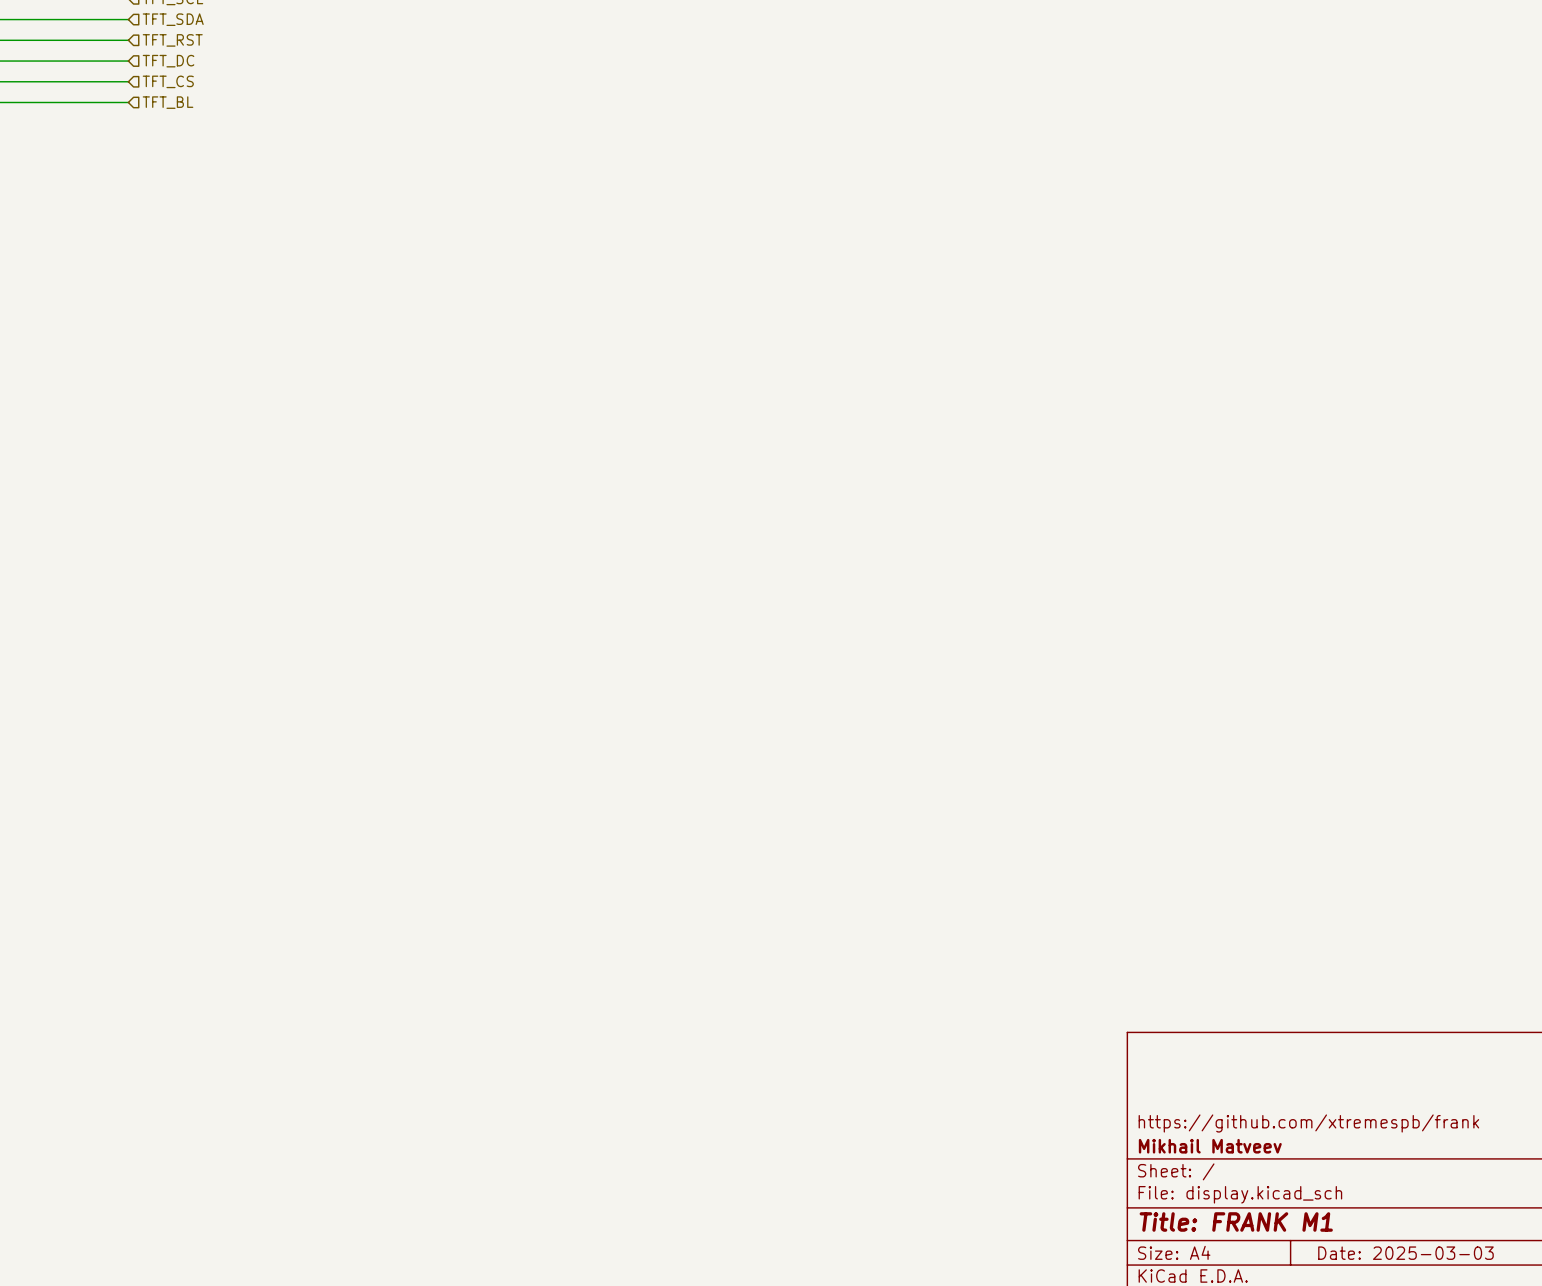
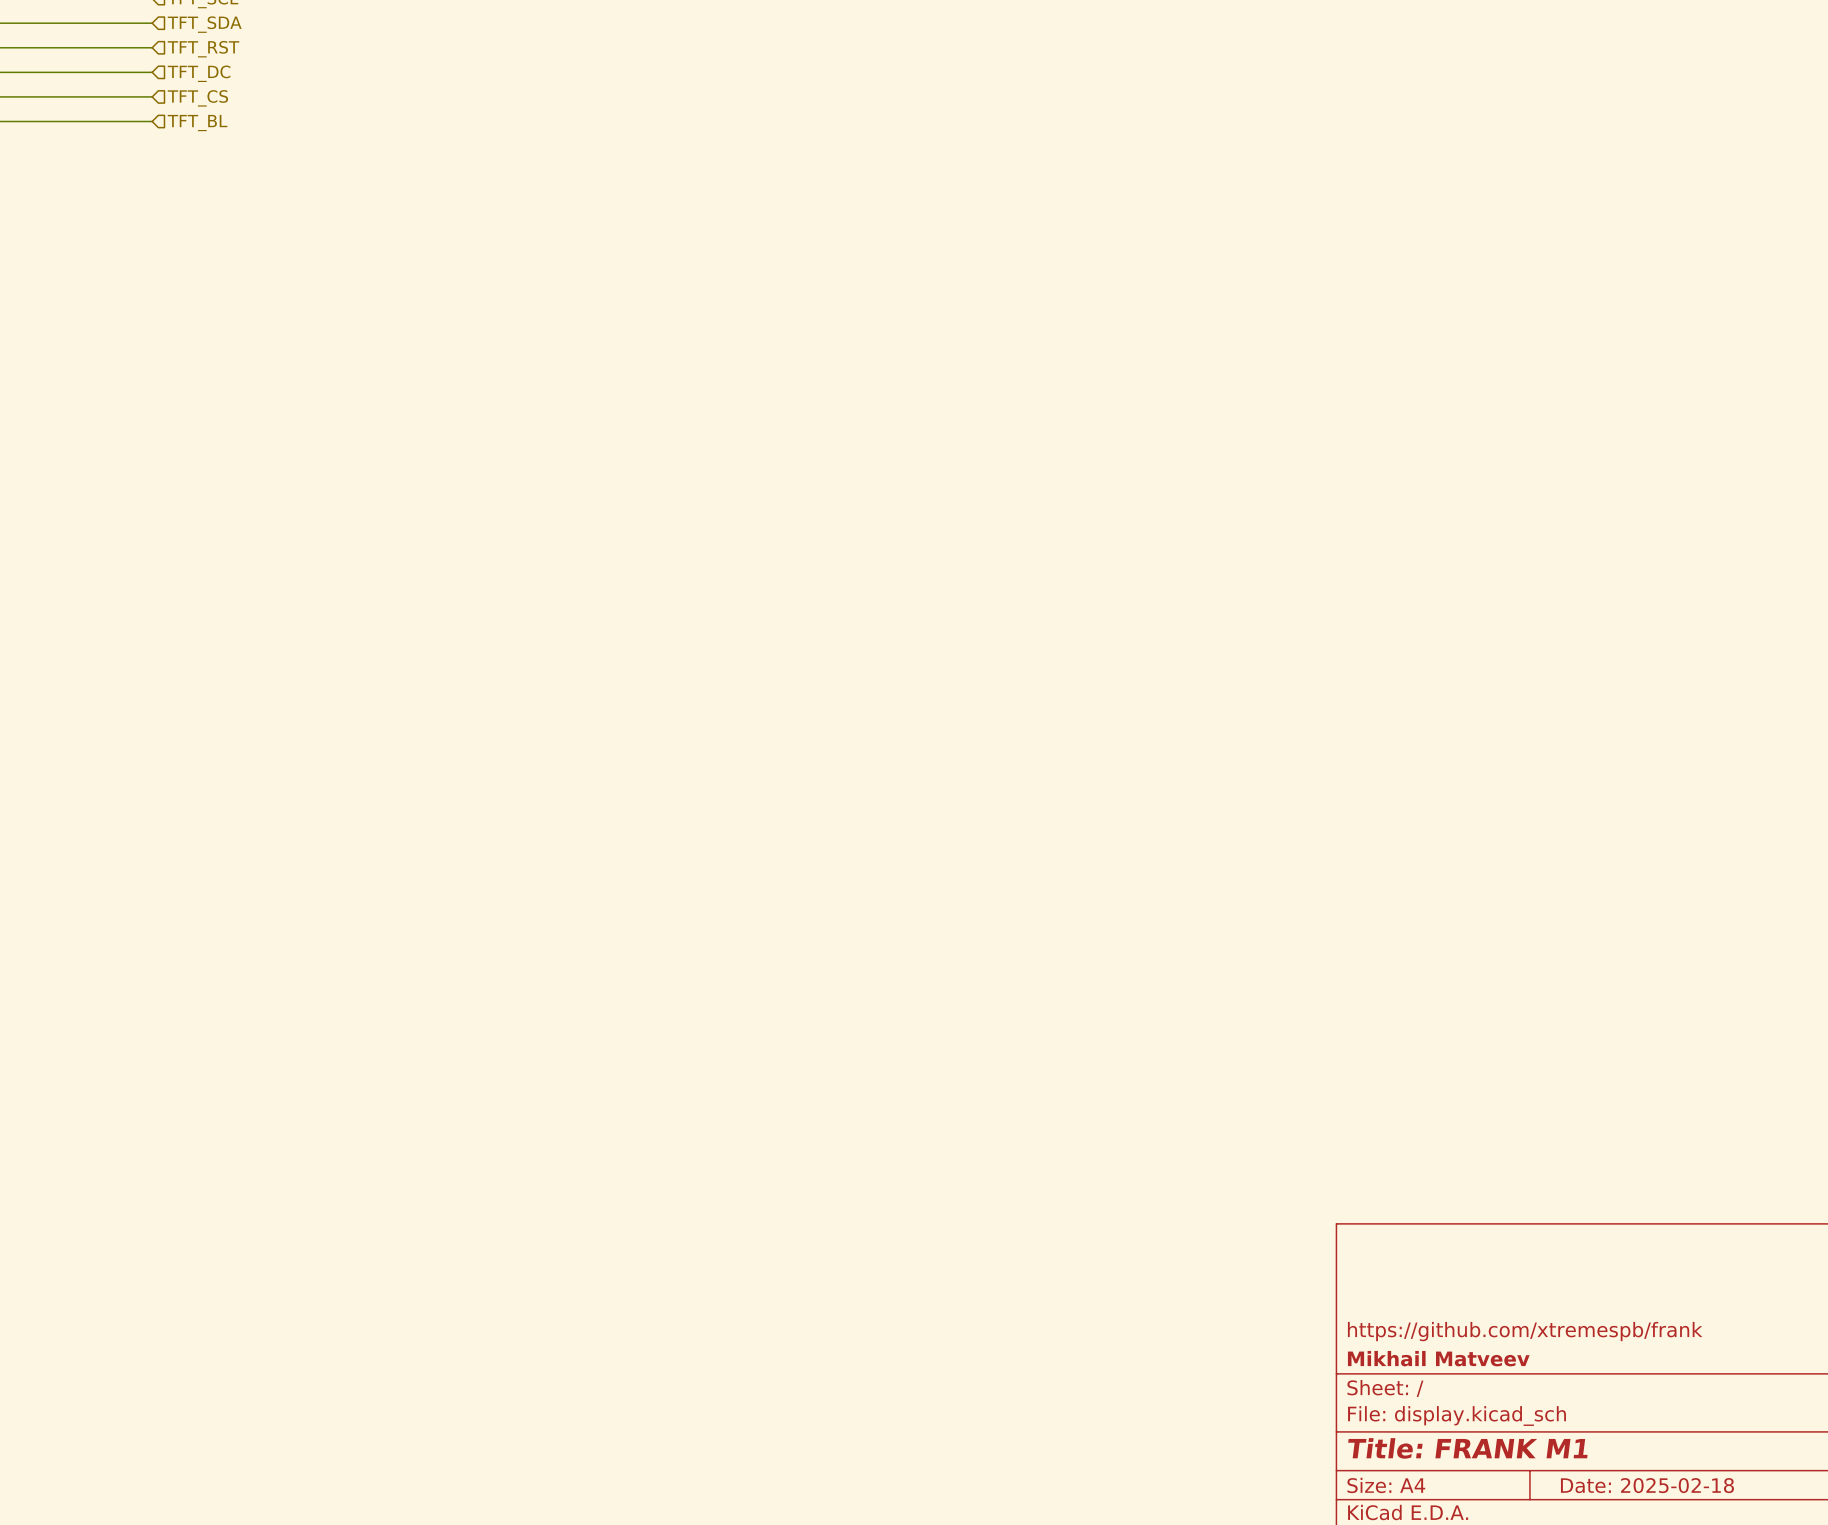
title block: Date: 2025-03-03 (1405, 1253) -> Date: 2025-02-18 (1647, 1485)

